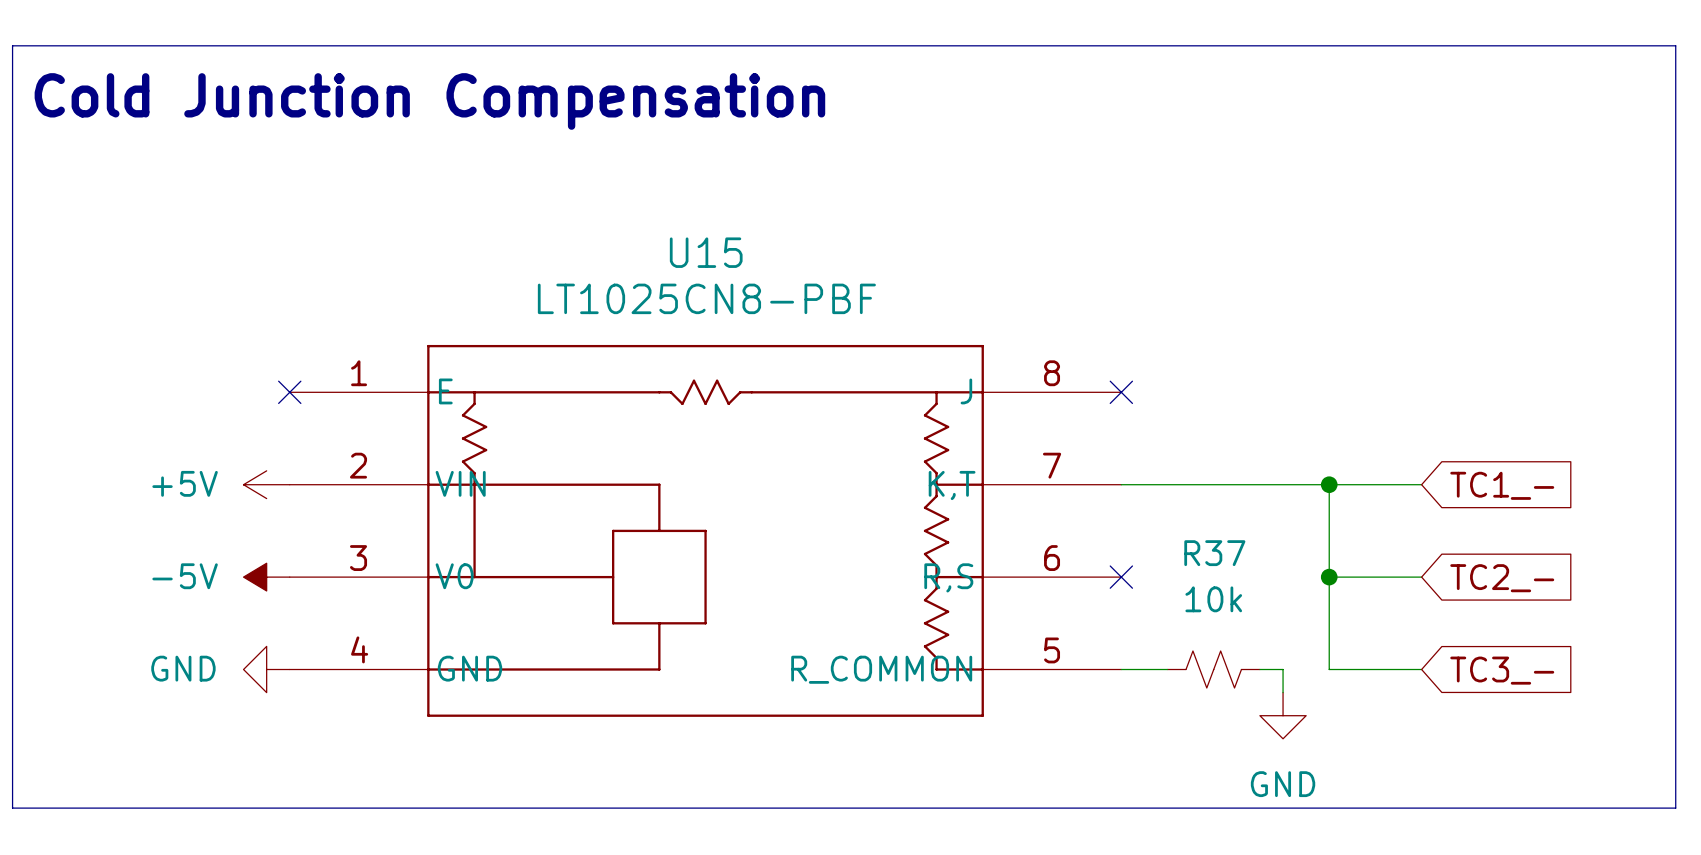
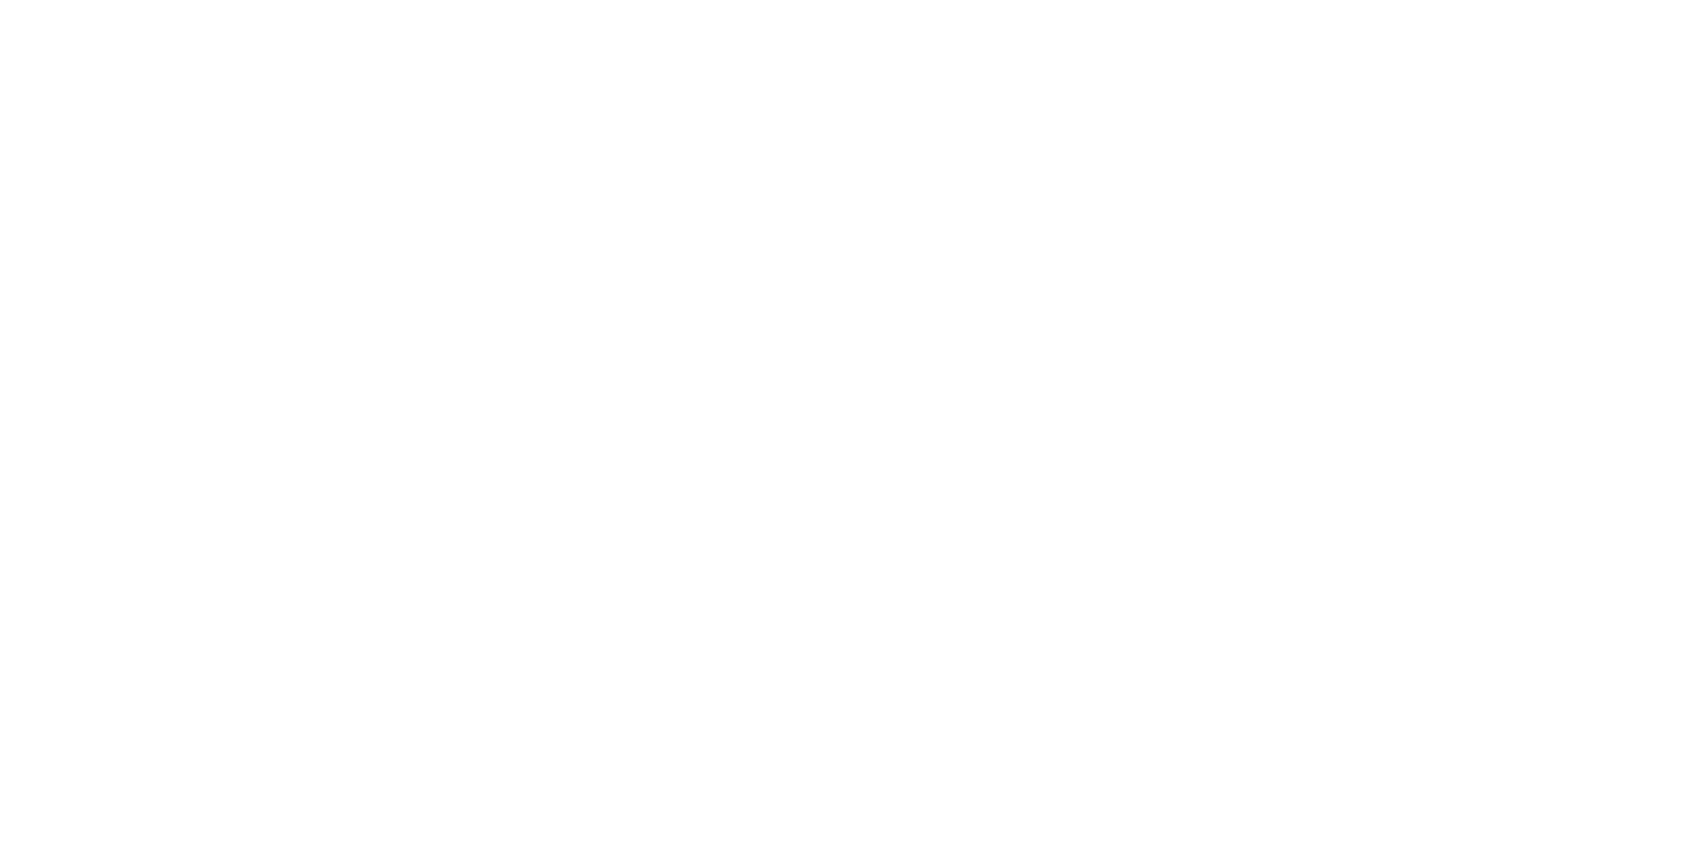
line: (12, 45) (1675, 45) (1675, 808) (12, 808) (12, 45) -> none
text: Cold Junction Compensation (429, 101) -> none
no-connect mark: (289, 392) -> none
no-connect mark: (1121, 392) -> none
power symbol: +5V (266, 484) -> none
wire: (1121, 484) (1421, 484) -> none
wire: (1329, 484) (1329, 669) (1421, 669) -> none
junction: (1329, 484) -> none
global label: TC1_- (1502, 485) -> none
U15: LT1025CN8-PBF (705, 530) -> none
power symbol: -5V (266, 577) -> none
no-connect mark: (1121, 577) -> none
wire: (1329, 577) (1421, 577) -> none
junction: (1329, 577) -> none
global label: TC2_- (1502, 578) -> none
power symbol: GND (266, 669) -> none
wire: (1121, 669) (1167, 669) -> none
R37: 10k (1213, 669) -> none
wire: (1259, 669) (1283, 669) (1283, 692) -> none
global label: TC3_- (1502, 670) -> none
power symbol: GND (1283, 715) -> none

